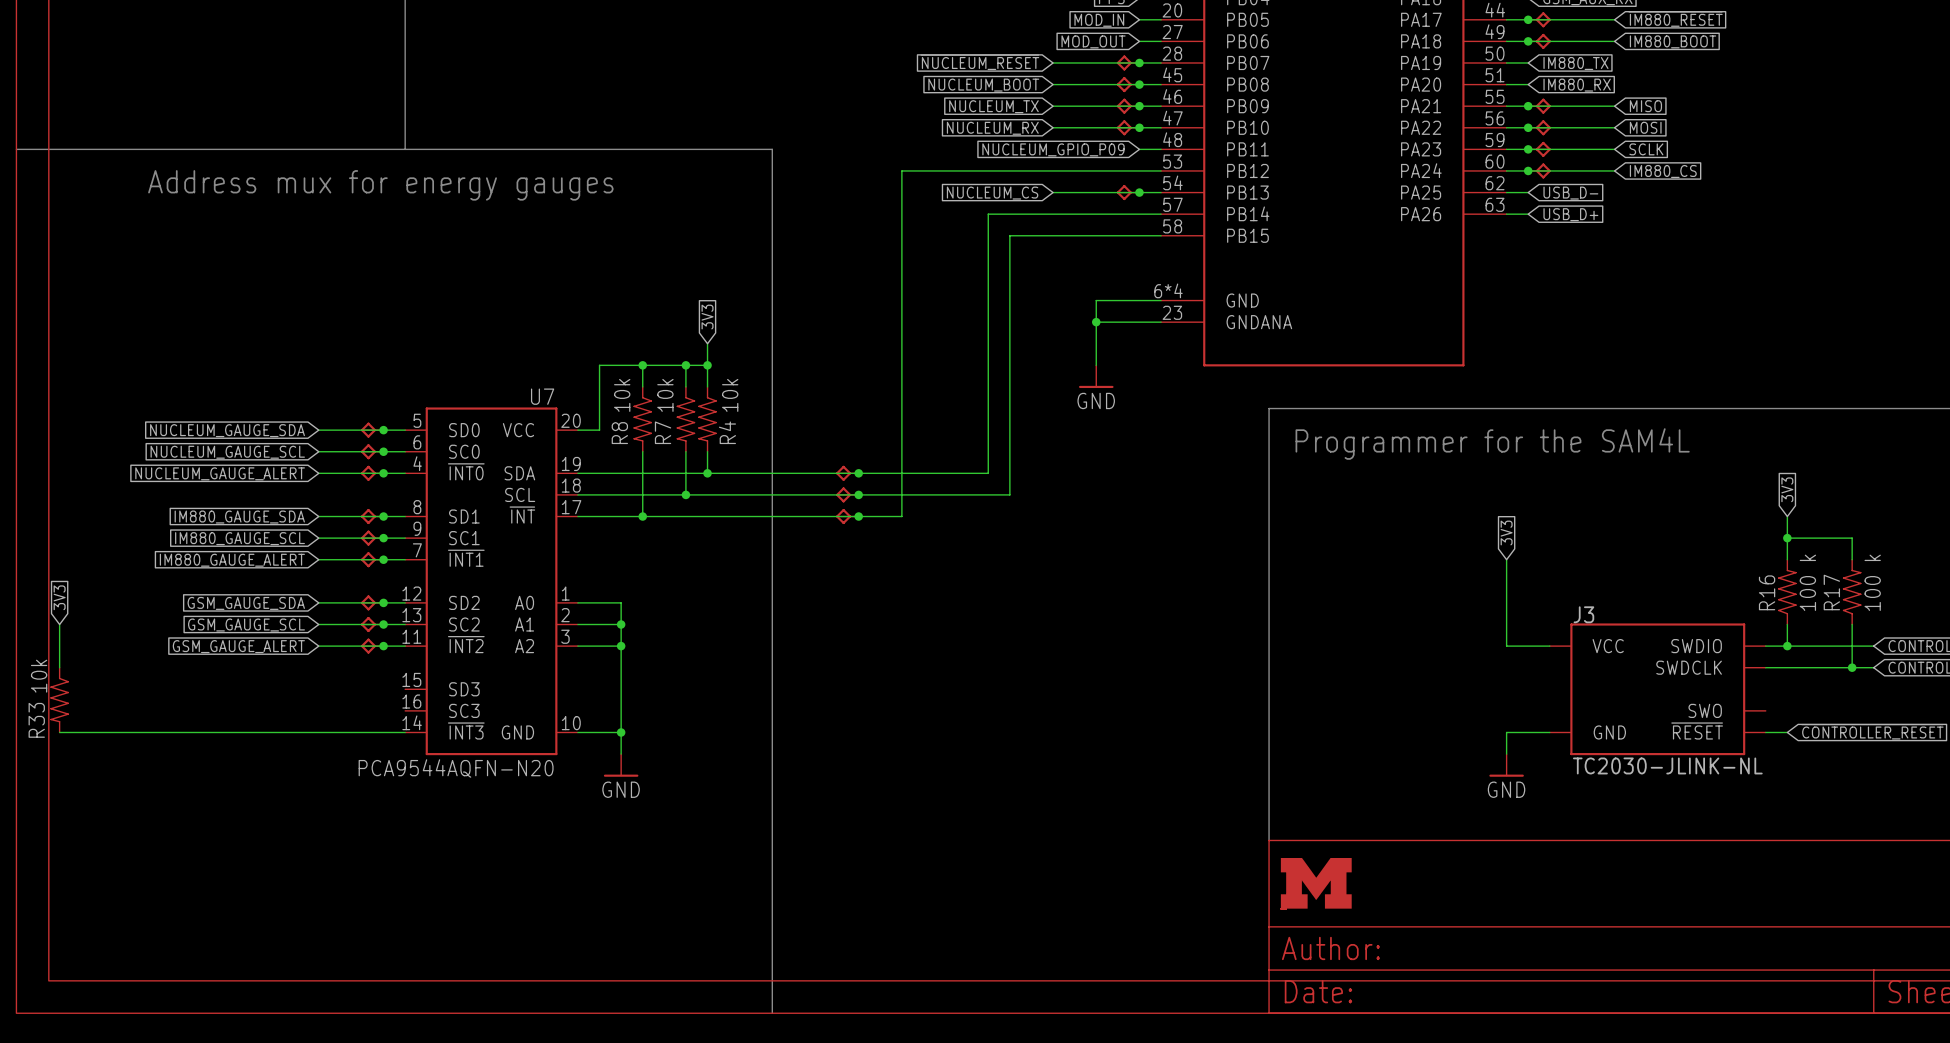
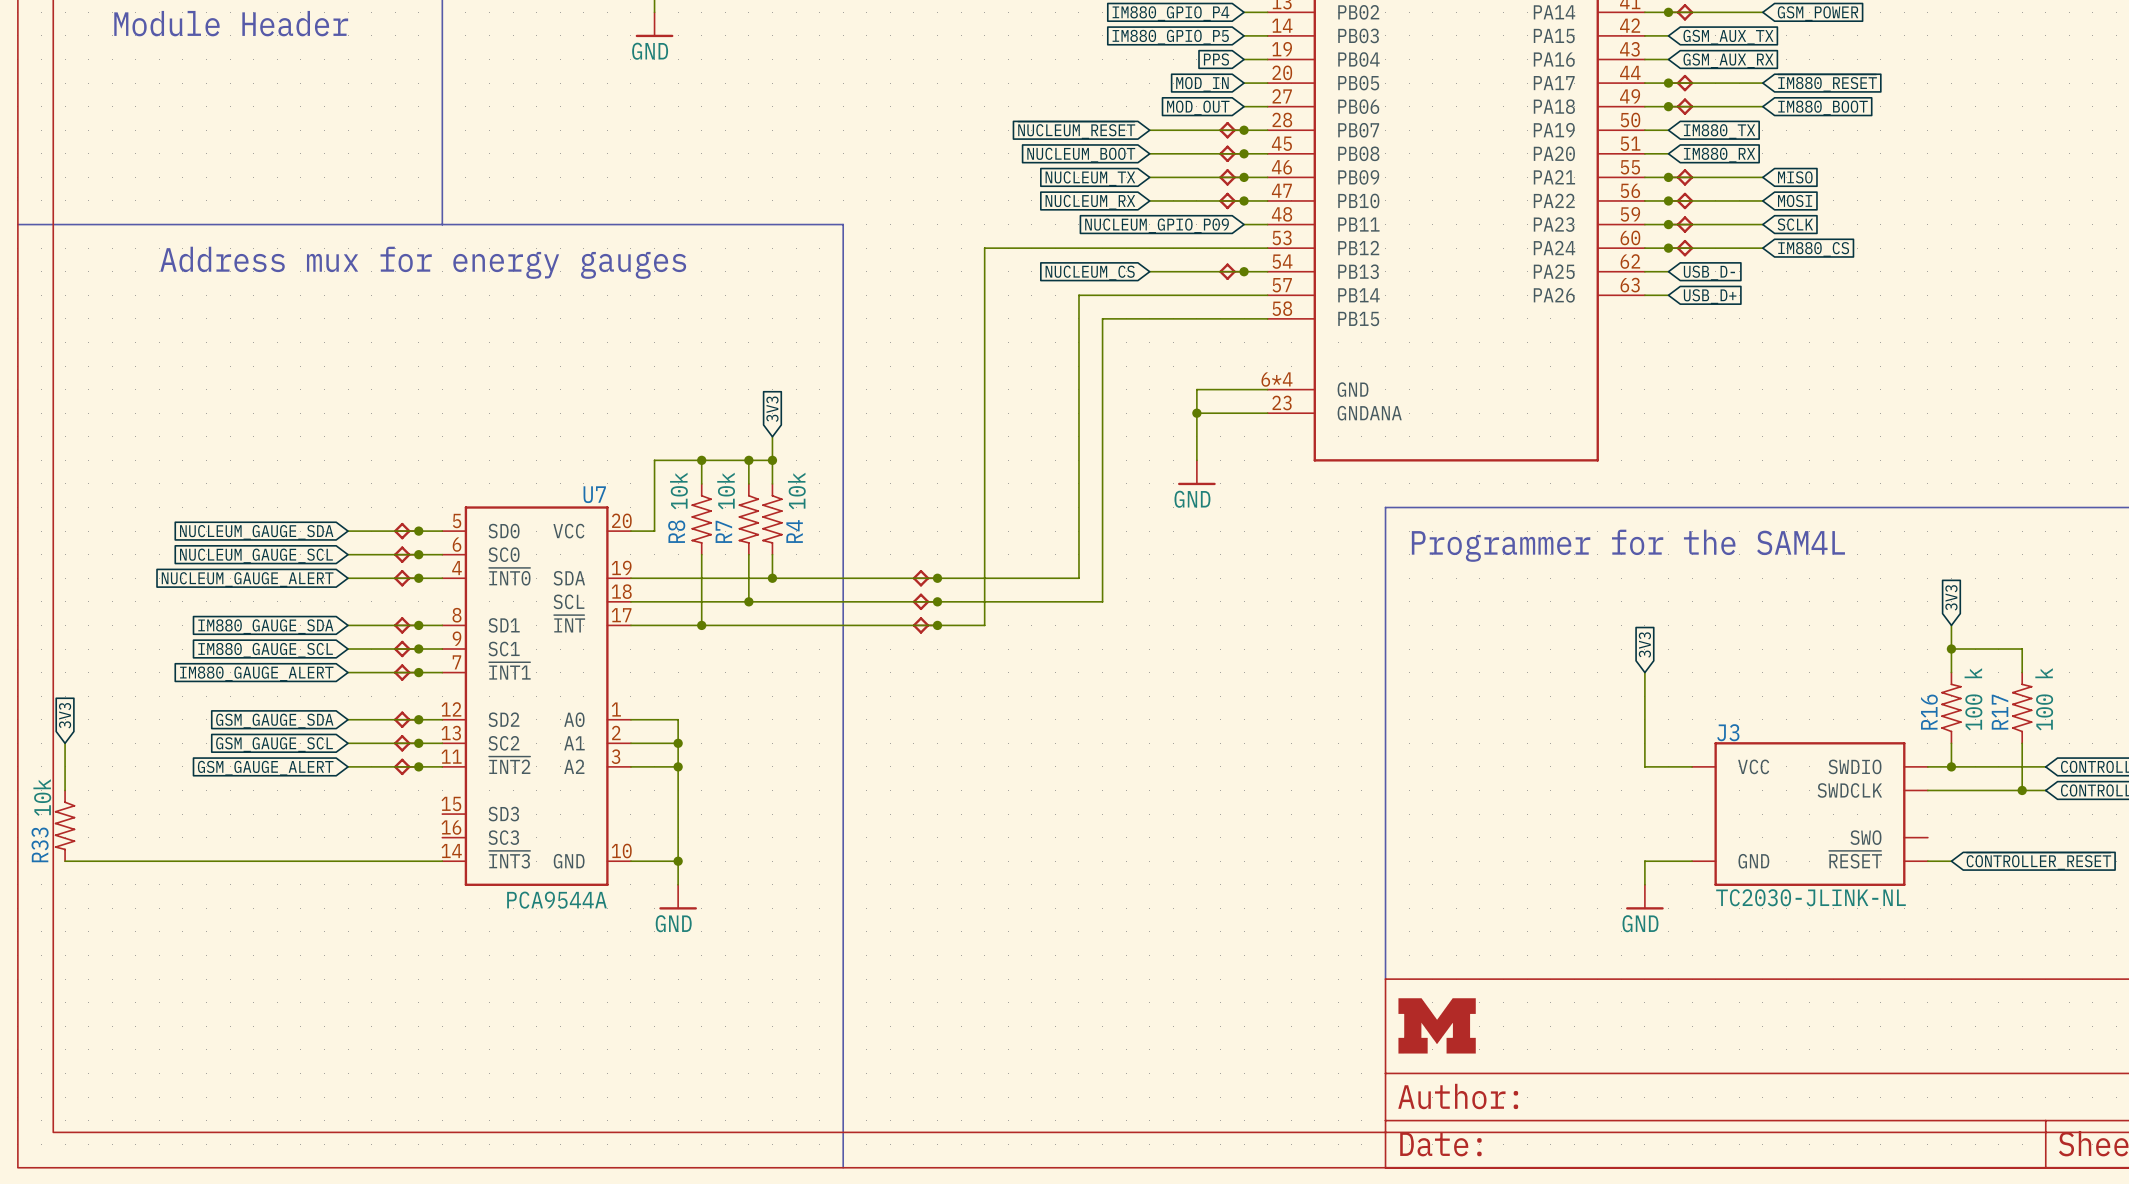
U7 value: PCA9544AQFN-N20 (456, 768) -> PCA9544A (556, 900)

